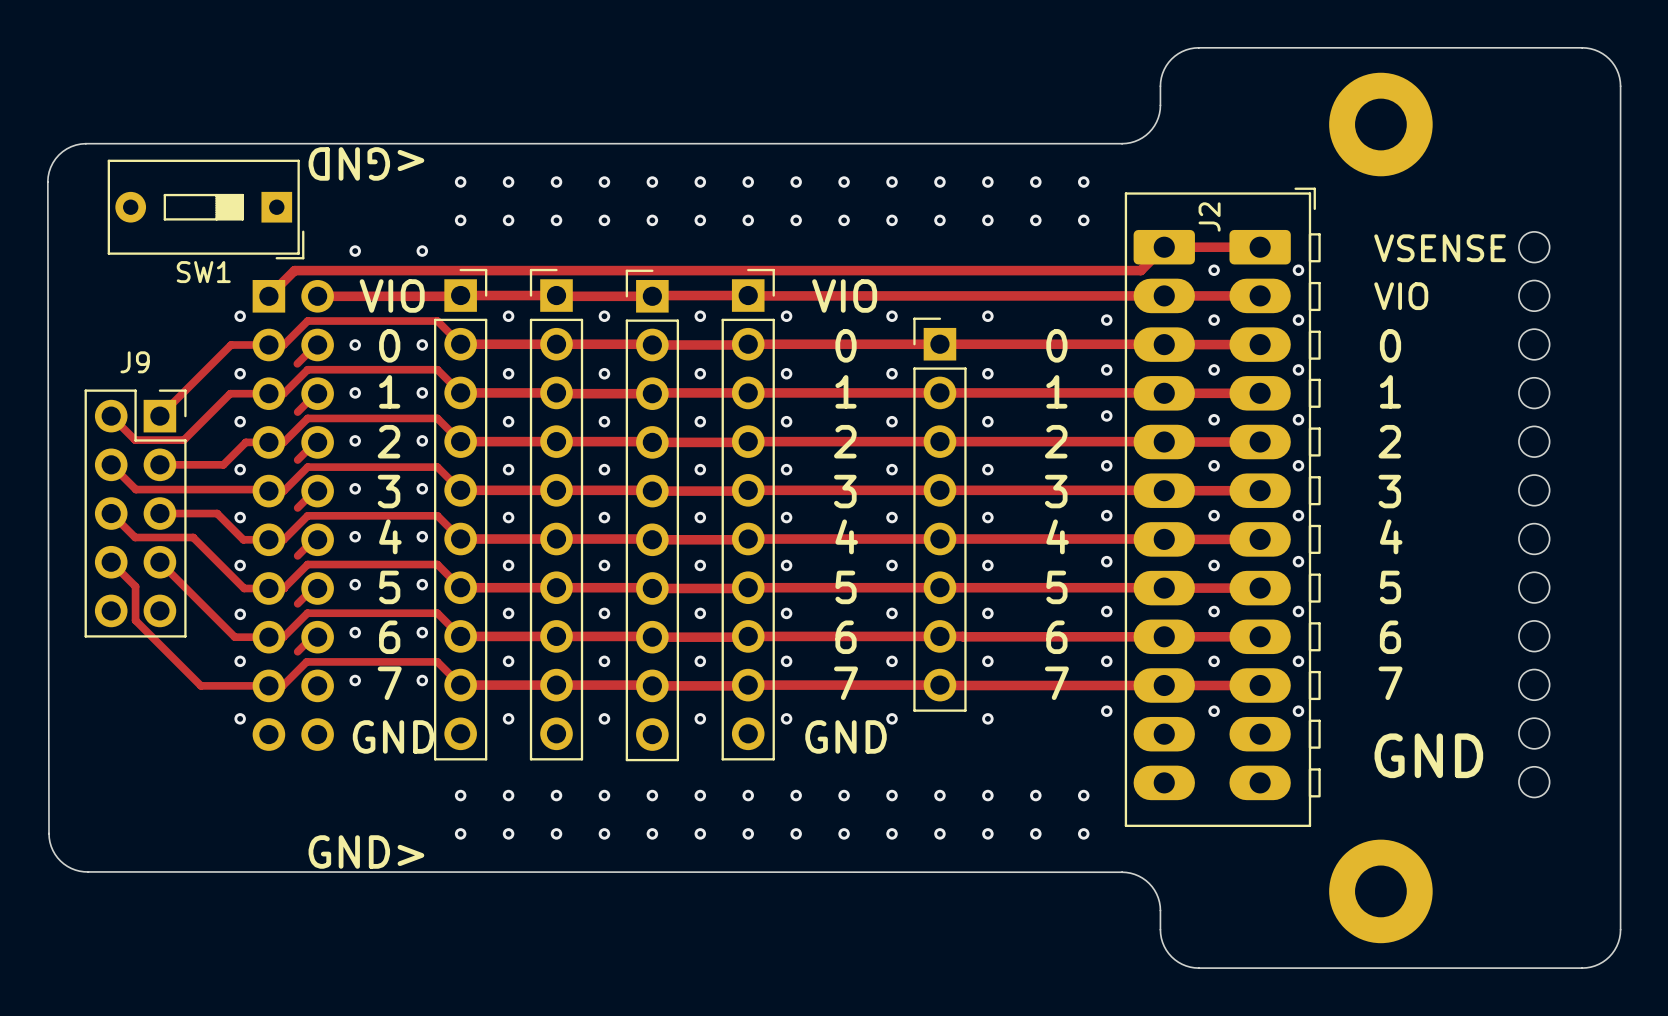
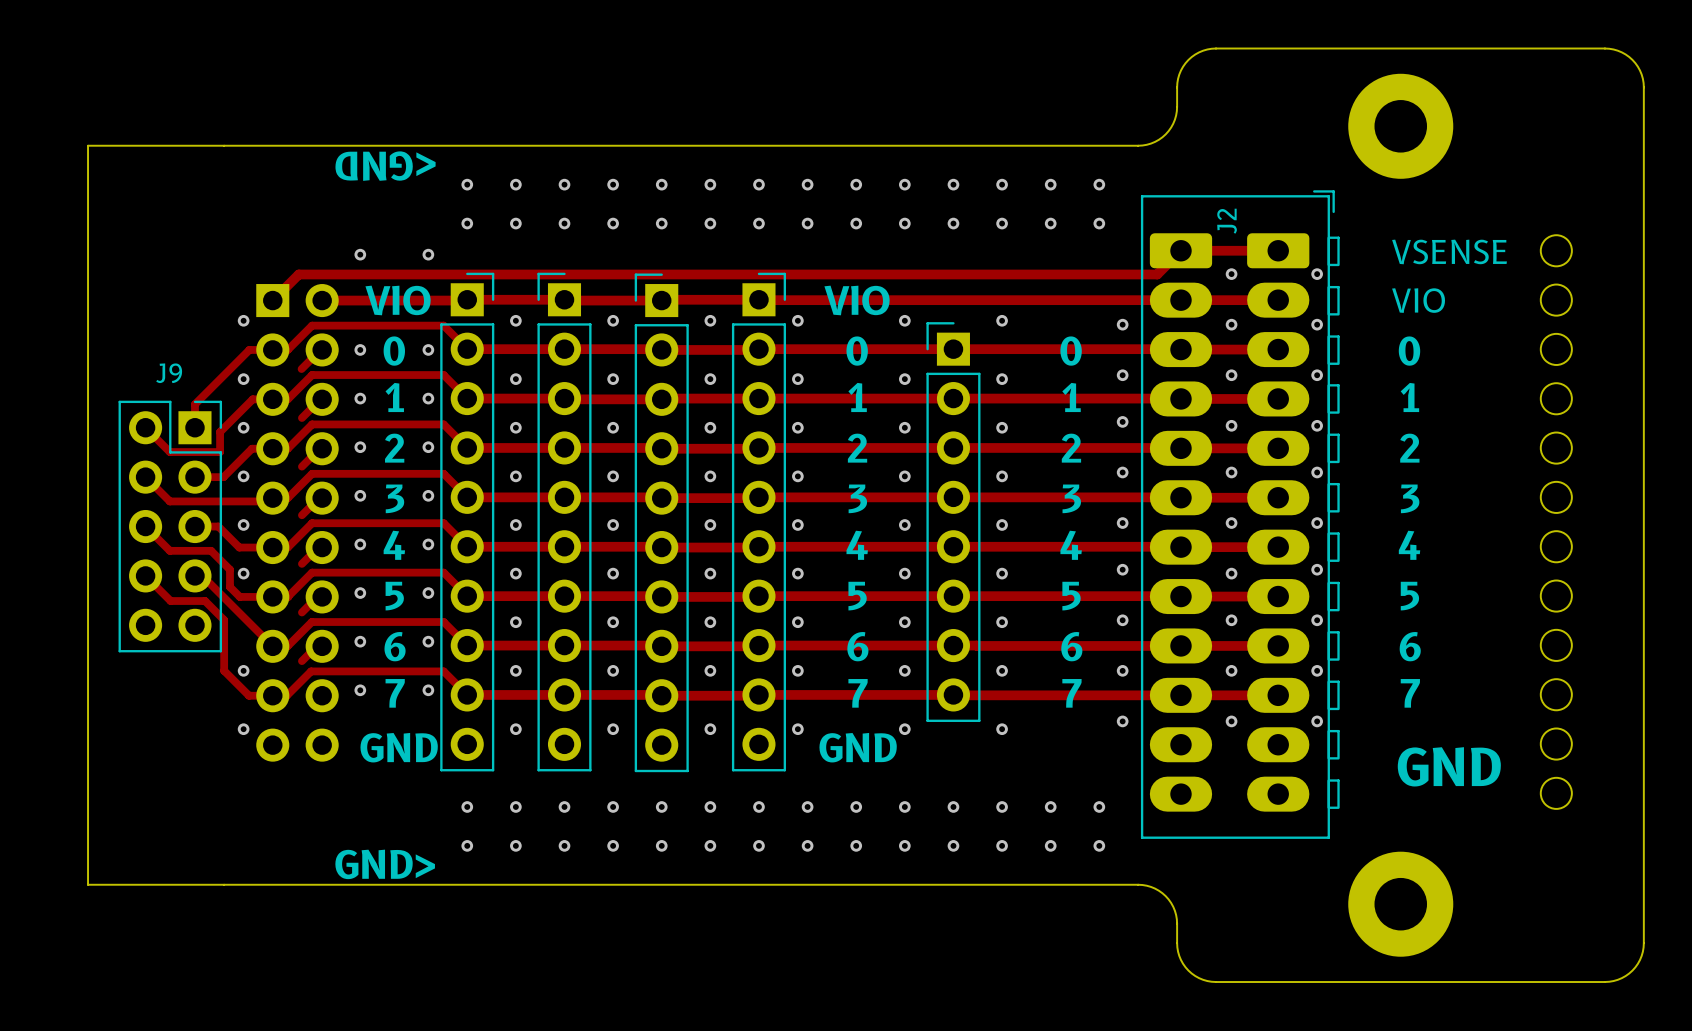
board edge: (86, 143) (71, 146) (59, 154) (50, 167) (47, 181) (49, 833) (52, 850) (63, 863) (75, 870) (88, 871) (1122, 872) (1134, 874) (1149, 883) (1158, 897) (1160, 910) -> (88, 145) (88, 884) (1138, 884) (1151, 886) (1165, 896) (1174, 910) (1177, 923)
SW1: (206, 209) -> none
track: (245, 344) (231, 345) (159, 416) -> (249, 349) (194, 404) (194, 427)
track: (249, 393) (230, 393) (183, 440) (135, 440) (111, 416) -> (252, 399) (220, 432) (220, 452) (169, 452) (145, 427)
track: (248, 442) (245, 442) (223, 464) (159, 464) -> (251, 448) (223, 477) (194, 477)
track: (111, 464) (135, 489) (267, 489) (268, 491) -> none
track: none -> (145, 477) (169, 501) (269, 501)
track: (111, 513) (135, 537) (193, 537) (244, 588) -> (145, 526) (169, 550) (211, 550) (229, 569) (229, 587) (239, 596) (247, 596)
J9 position: (135, 513) -> (170, 526)
track: (159, 513) (217, 513) (243, 539) -> (194, 526) (218, 526) (239, 547) (246, 547)
track: (111, 562) (135, 586) (135, 620) (200, 685) (245, 685) -> (145, 575) (170, 601) (205, 601) (224, 620) (224, 670) (249, 695)
track: (159, 562) (234, 637) (268, 637) -> (194, 575) (202, 575) (272, 646)
via: (240, 614) -> none

